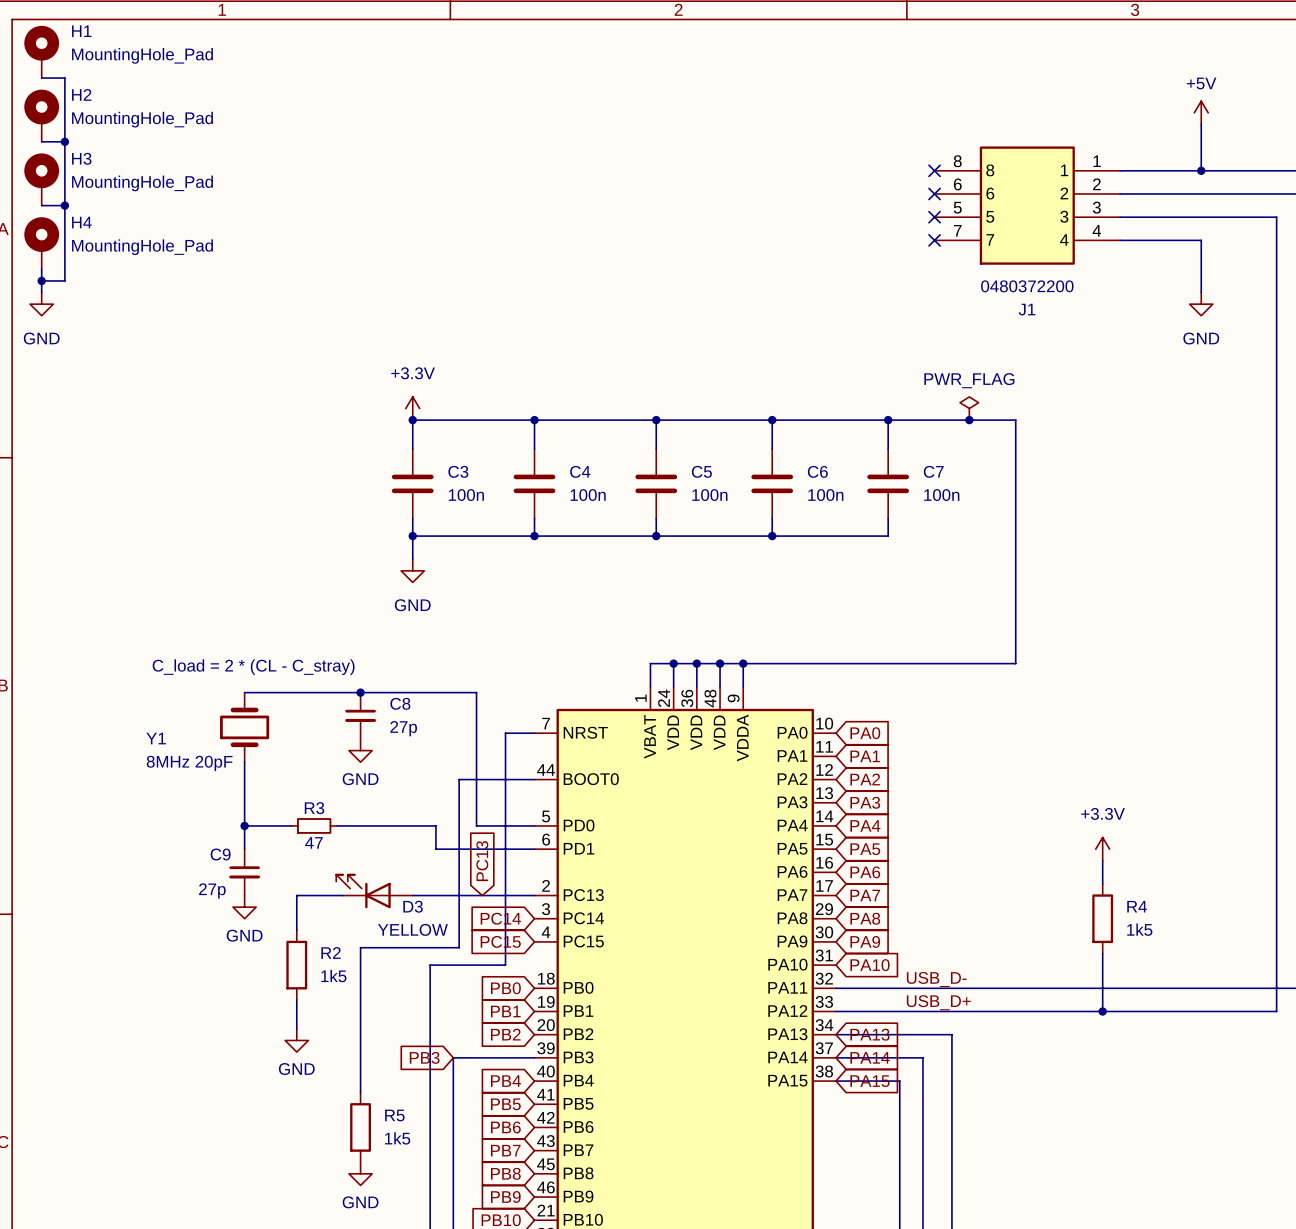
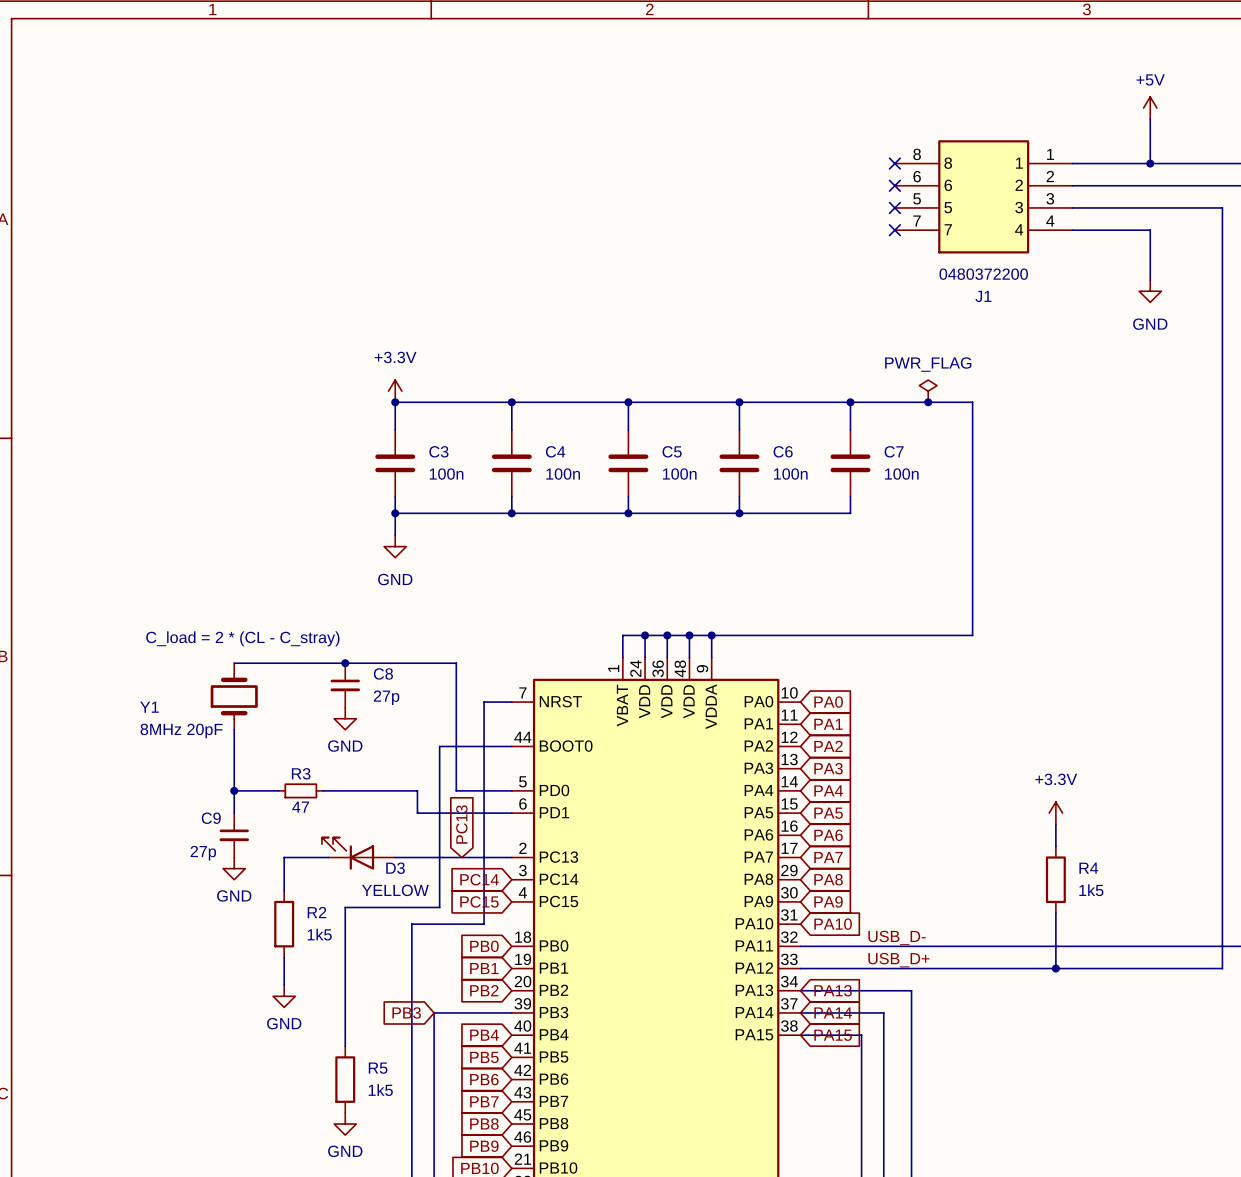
H1: MountingHole_Pad (41, 51) -> none
wire: (41, 78) (64, 78) (64, 280) (41, 280) -> none
H2: MountingHole_Pad (41, 115) -> none
wire: (41, 141) (64, 141) -> none
junction: (64, 141) -> none
H3: MountingHole_Pad (41, 179) -> none
wire: (41, 205) (64, 205) -> none
junction: (64, 205) -> none
H4: MountingHole_Pad (41, 243) -> none
wire: (41, 269) (41, 292) -> none
junction: (41, 280) -> none
power symbol: GND (41, 304) -> none

